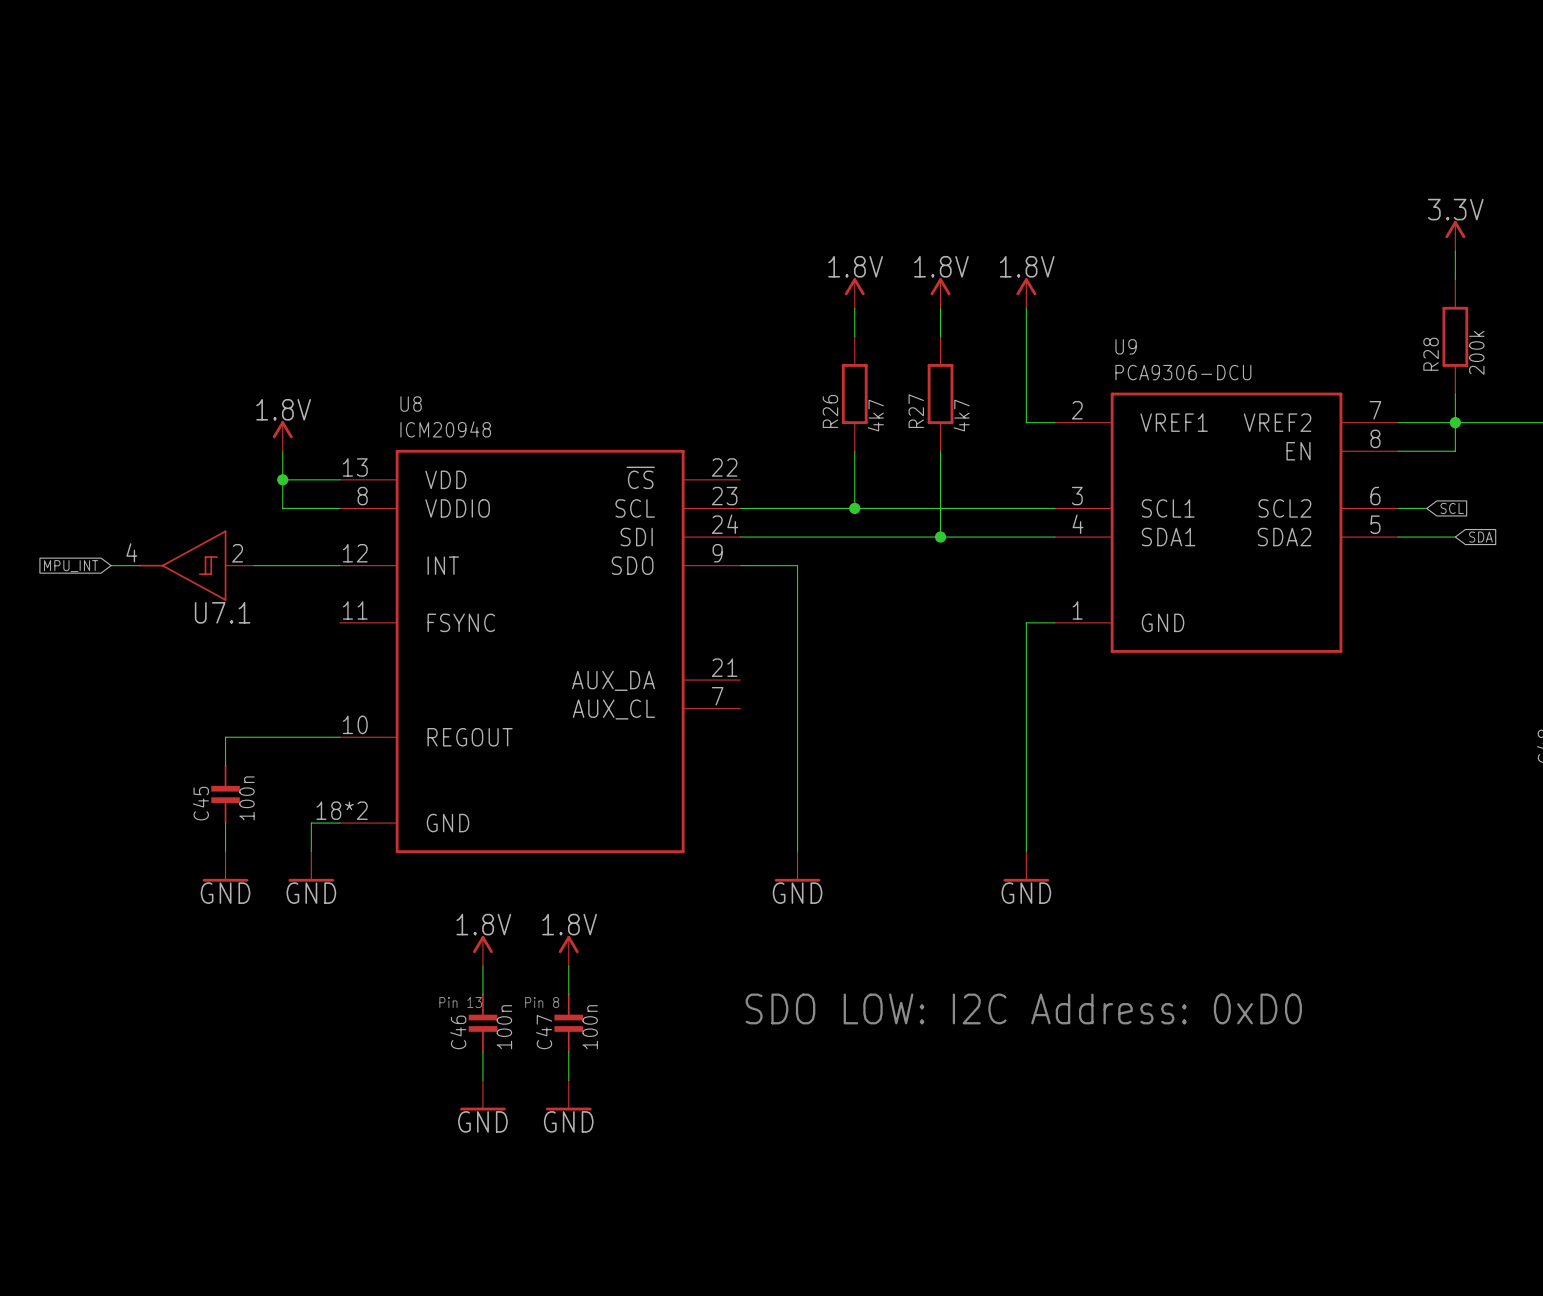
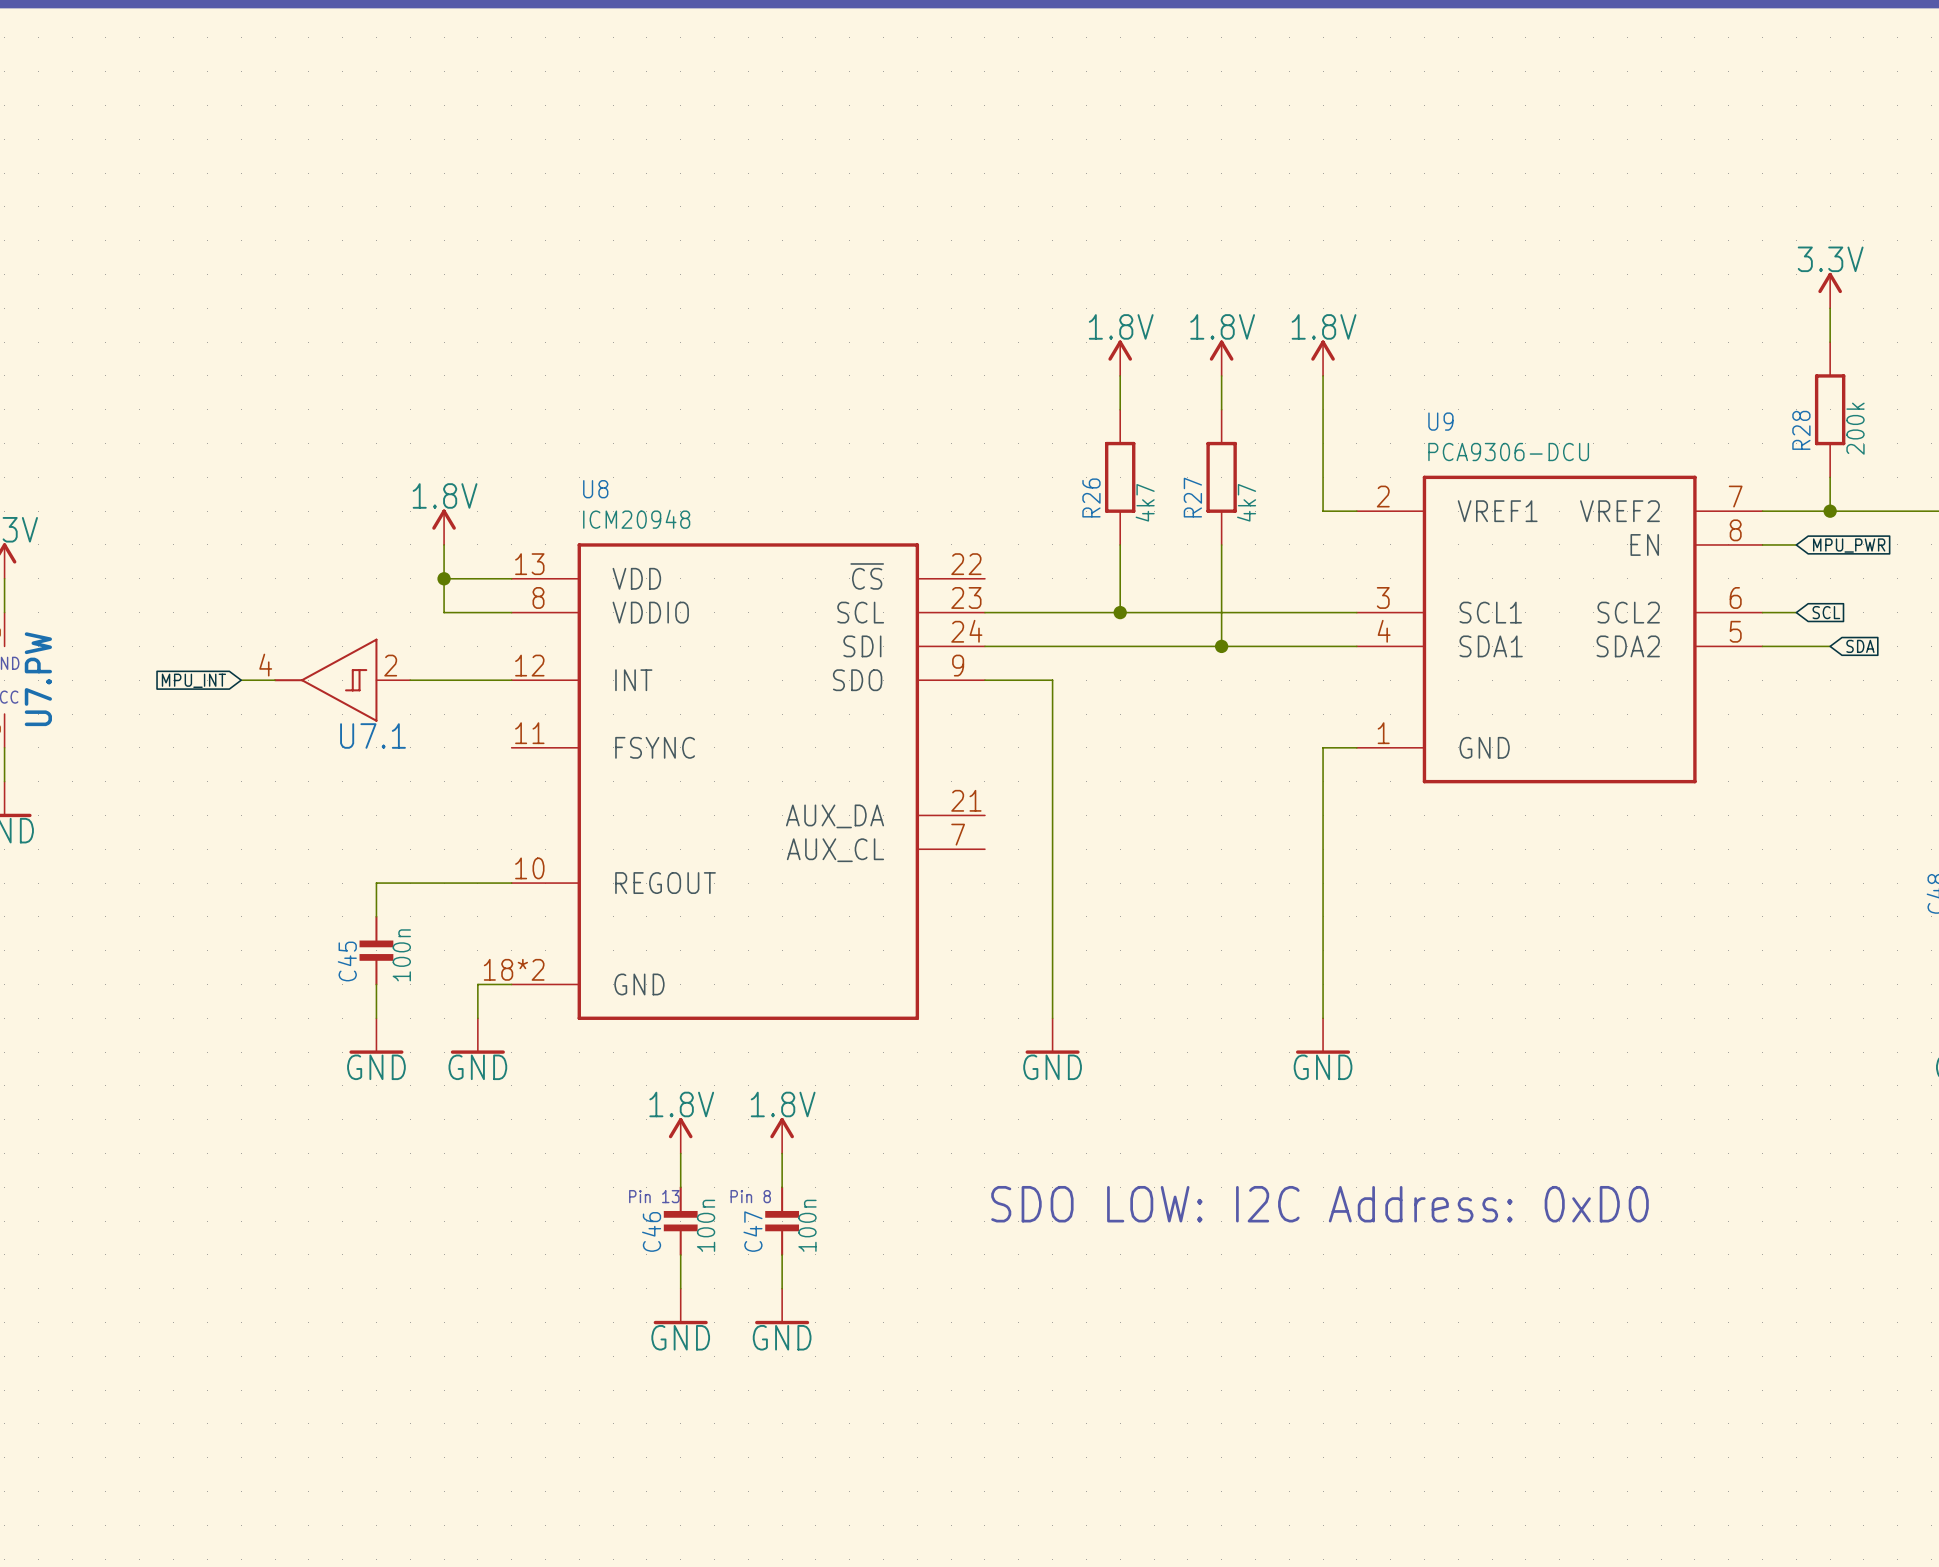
wire: (1455, 422) (1455, 451) (1426, 451) -> none
global label: none -> MPU_PWR (1849, 545)

